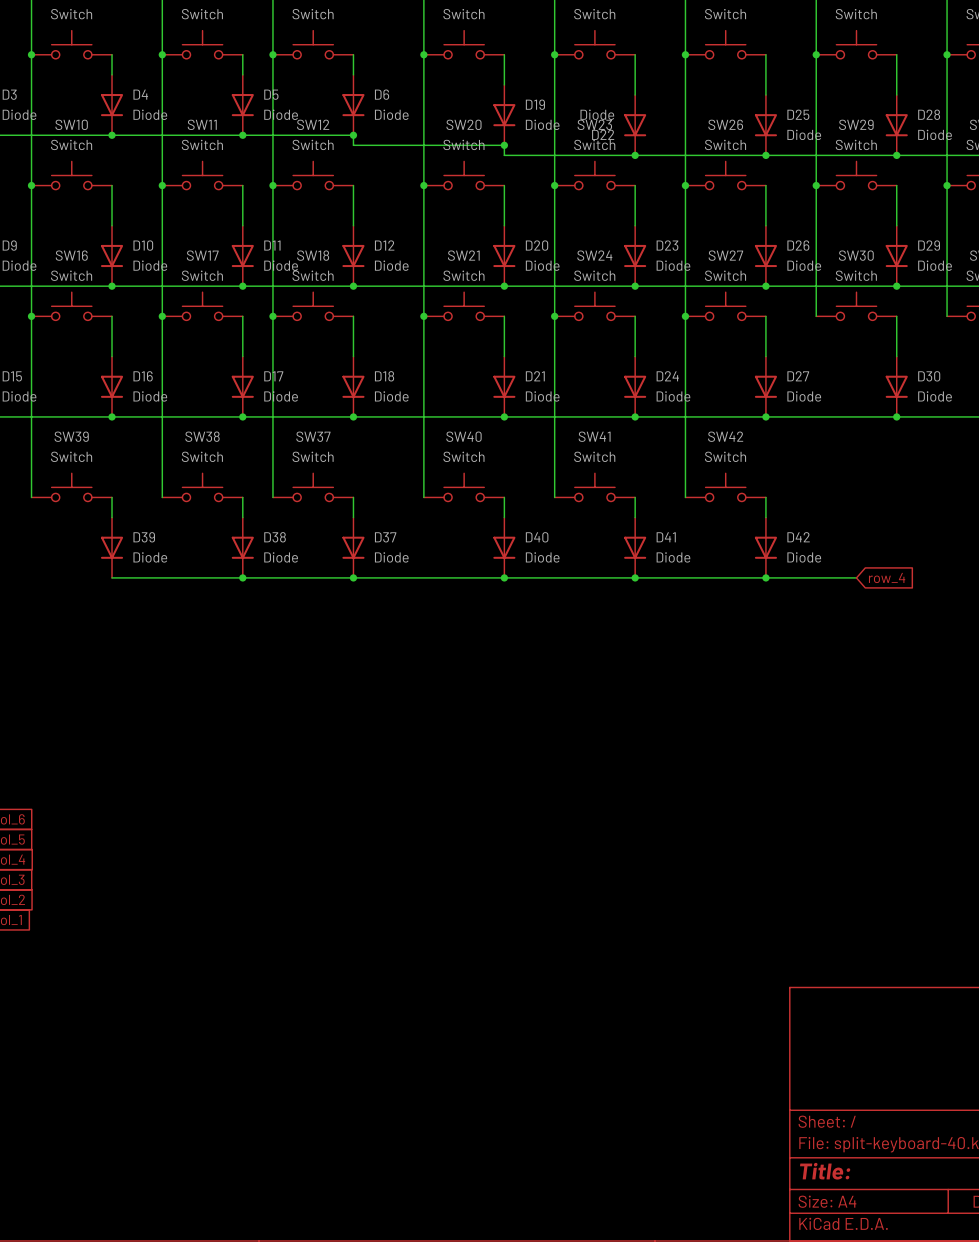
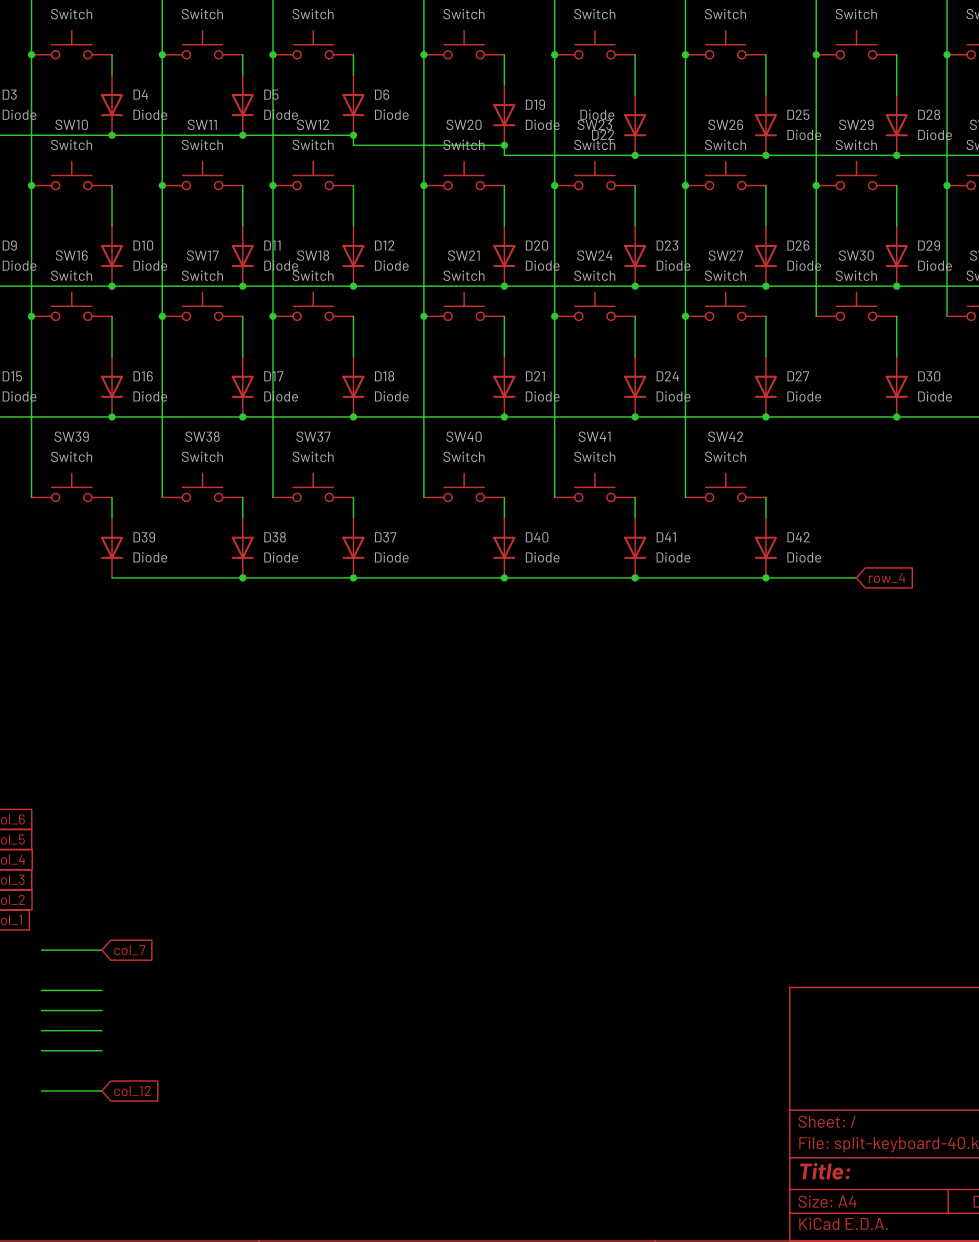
wire: none -> (41, 950) (101, 950)
global label: none -> col_7 (129, 950)
wire: none -> (41, 990) (101, 990)
wire: none -> (41, 1010) (101, 1010)
wire: none -> (41, 1030) (101, 1030)
wire: none -> (41, 1050) (101, 1050)
wire: none -> (41, 1091) (101, 1091)
global label: none -> col_12 (132, 1091)

